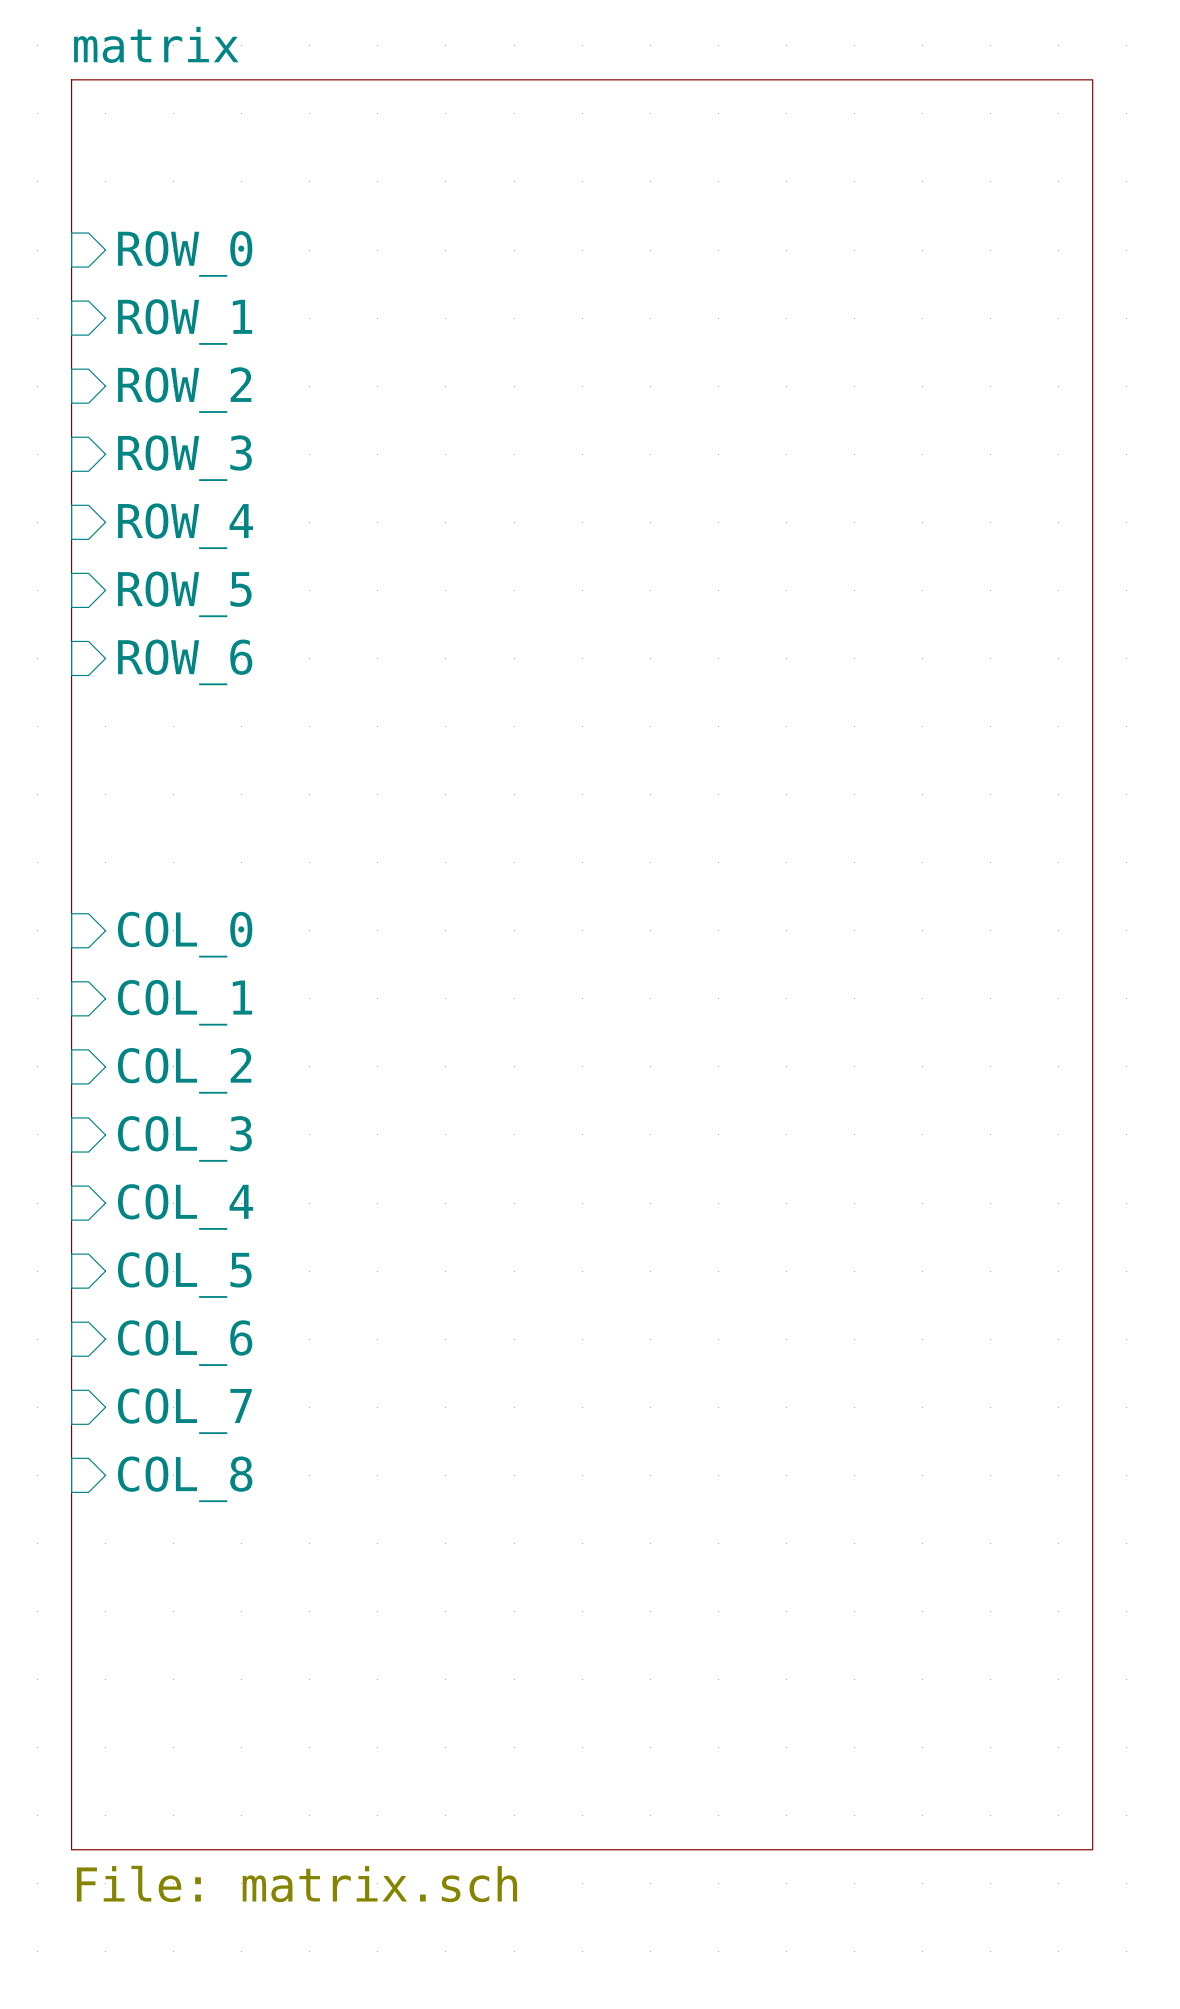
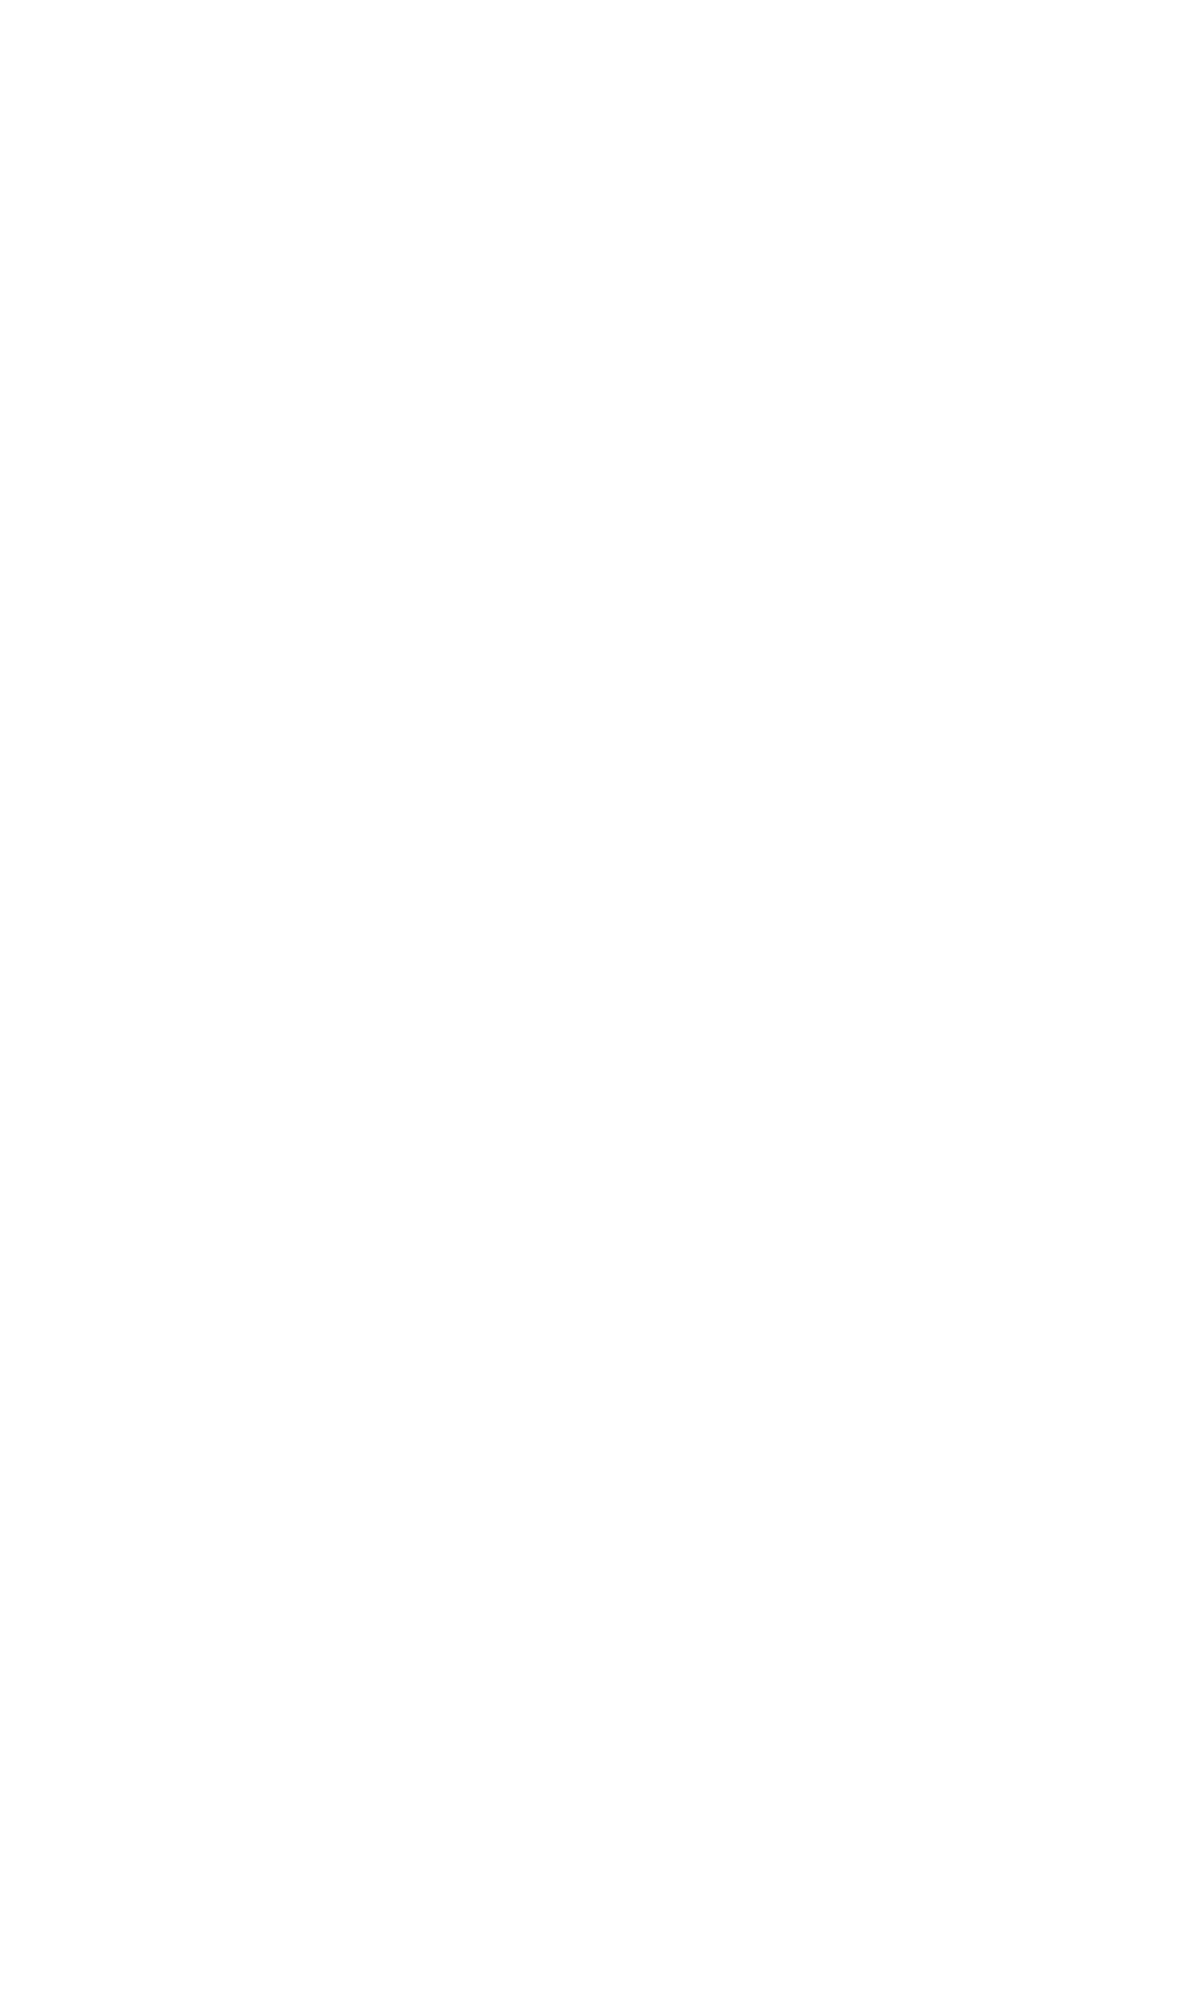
sheet pin: ROW_0 (185, 253) -> none
sheet pin: ROW_1 (185, 322) -> none
sheet pin: ROW_2 (184, 390) -> none
sheet pin: ROW_3 (184, 458) -> none
sheet pin: ROW_4 (185, 526) -> none
sheet pin: ROW_5 (184, 594) -> none
sheet pin: ROW_6 (185, 662) -> none
sheet pin: COL_0 (185, 934) -> none
sheet matrix: File: matrix.sch (582, 964) -> none
sheet pin: COL_1 (185, 1002) -> none
sheet pin: COL_2 (184, 1070) -> none
sheet pin: COL_3 (184, 1138) -> none
sheet pin: COL_4 (185, 1206) -> none
sheet pin: COL_5 (184, 1275) -> none
sheet pin: COL_6 (185, 1343) -> none
sheet pin: COL_7 (184, 1411) -> none
sheet pin: COL_8 (185, 1479) -> none

